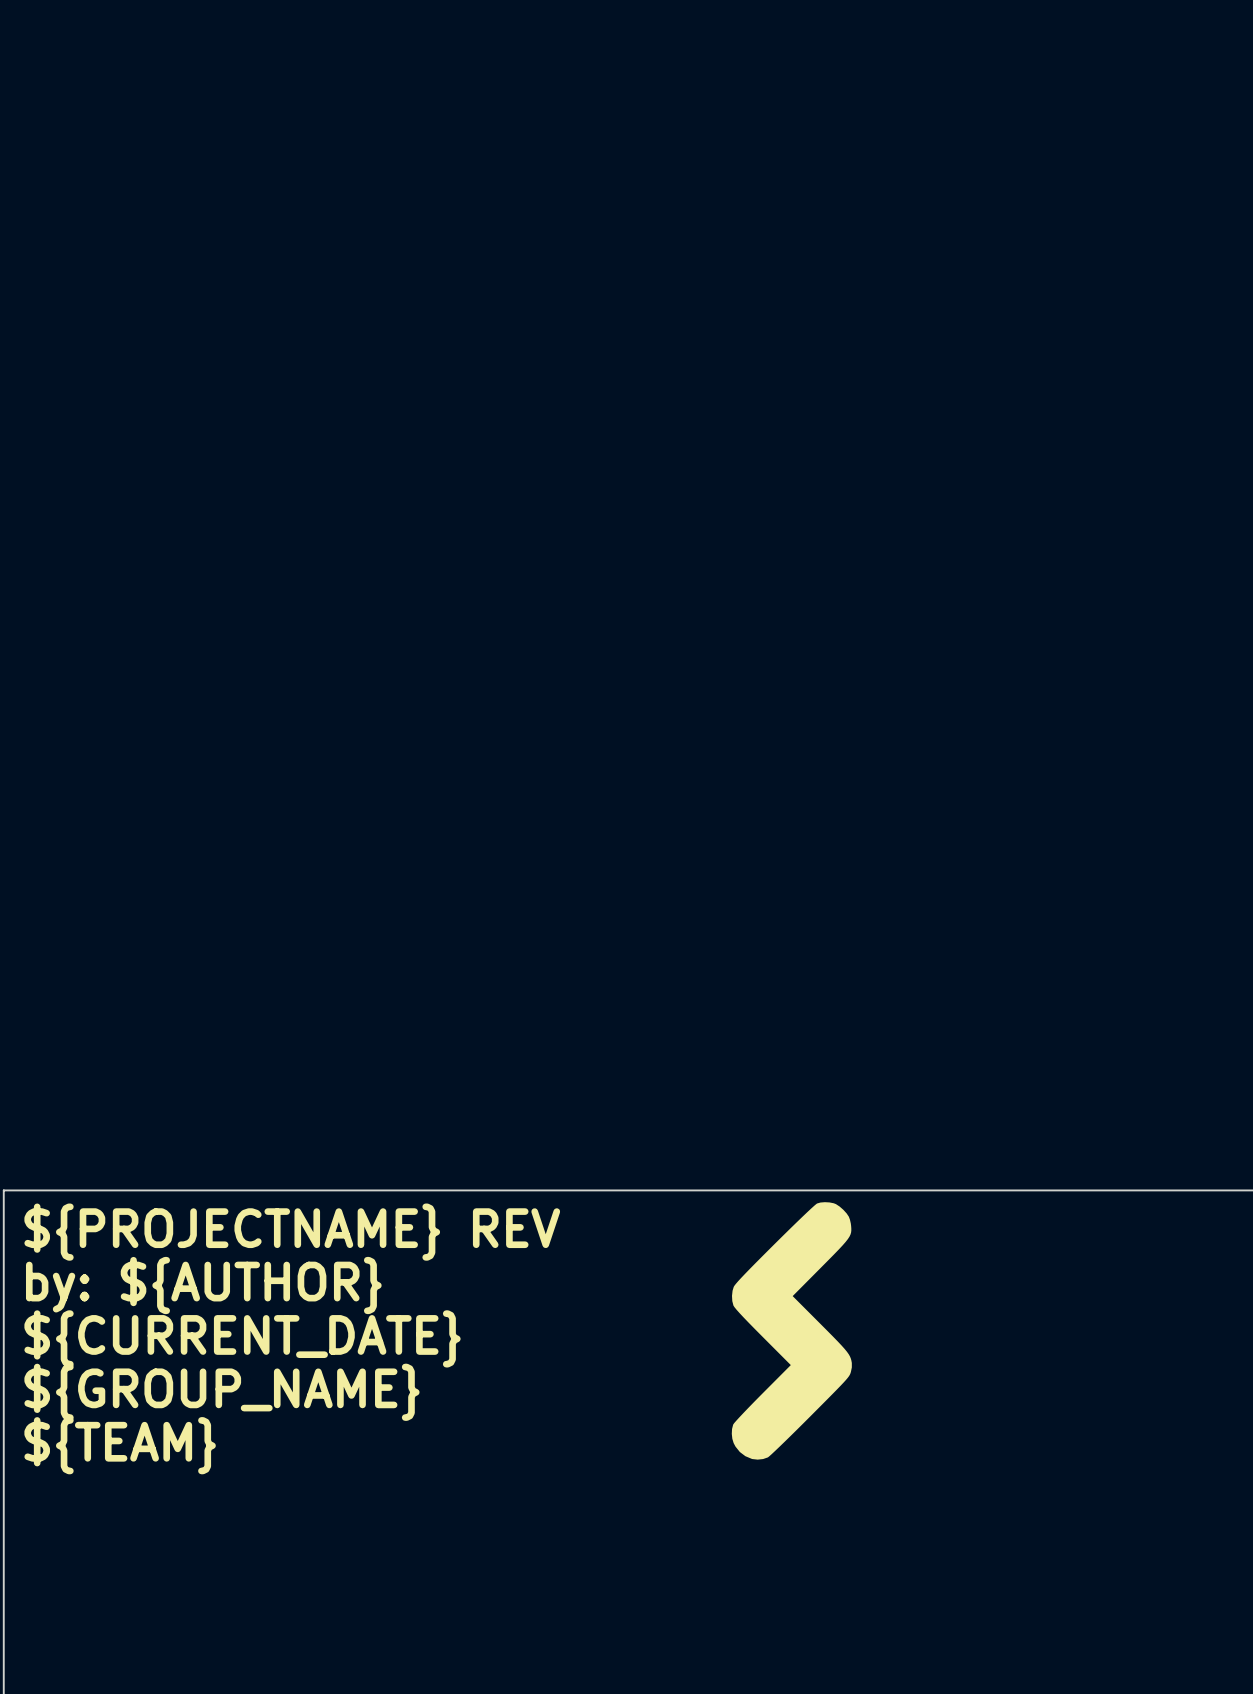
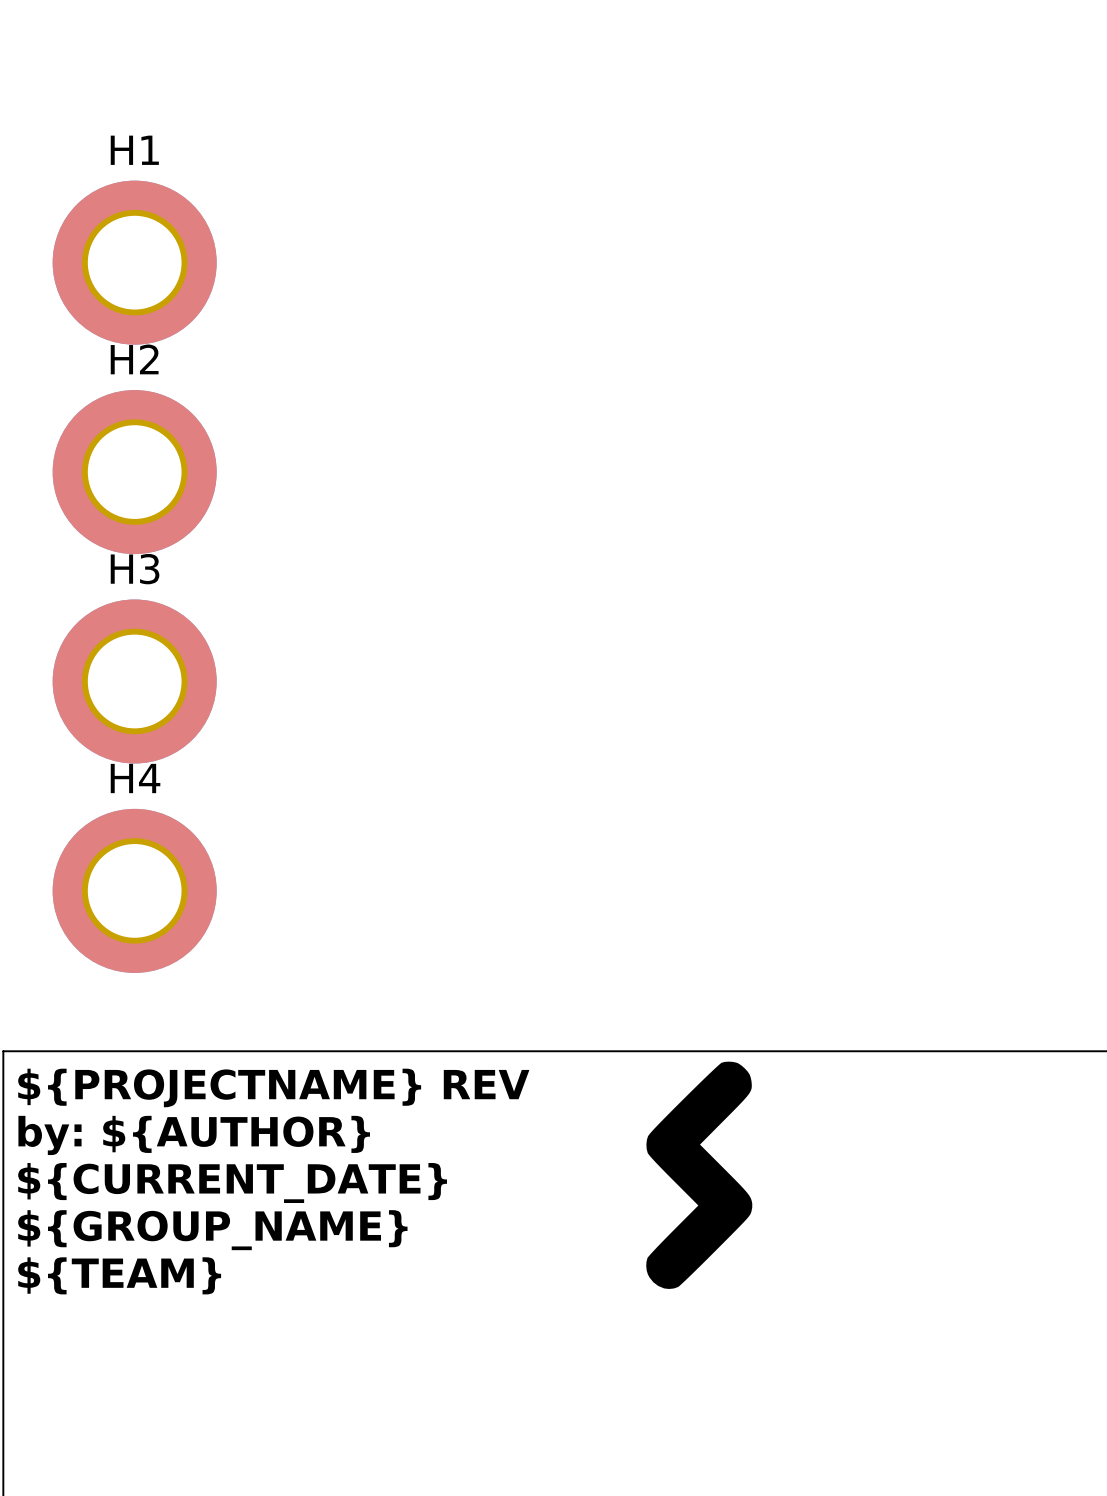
H1: none -> (134, 262)
H2: none -> (134, 472)
H3: none -> (134, 681)
H4: none -> (134, 890)

